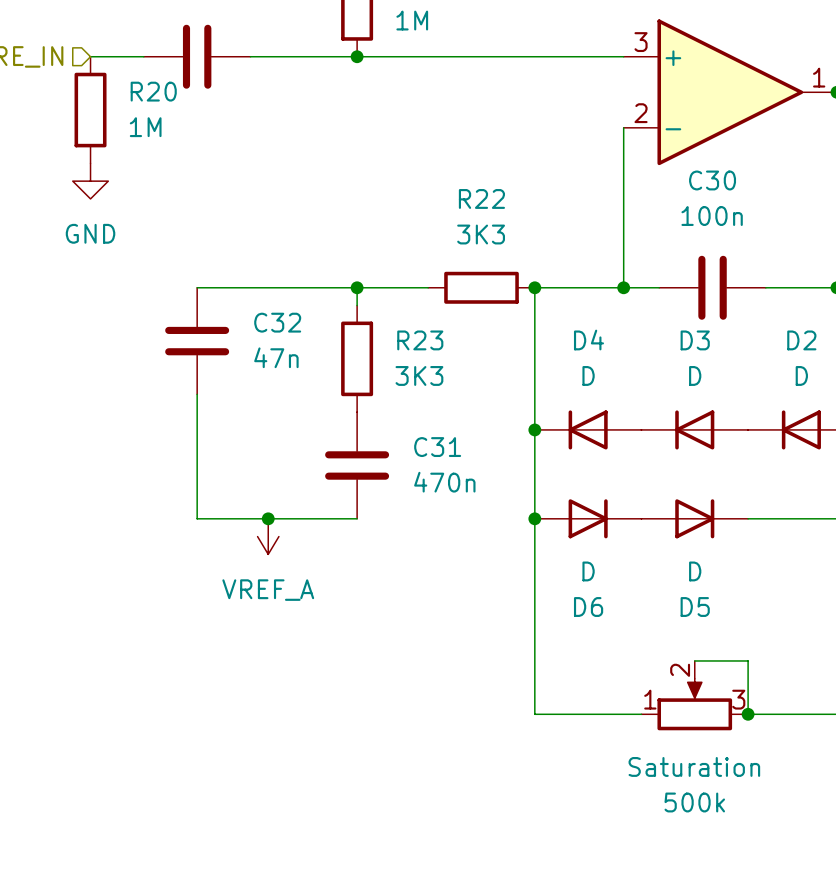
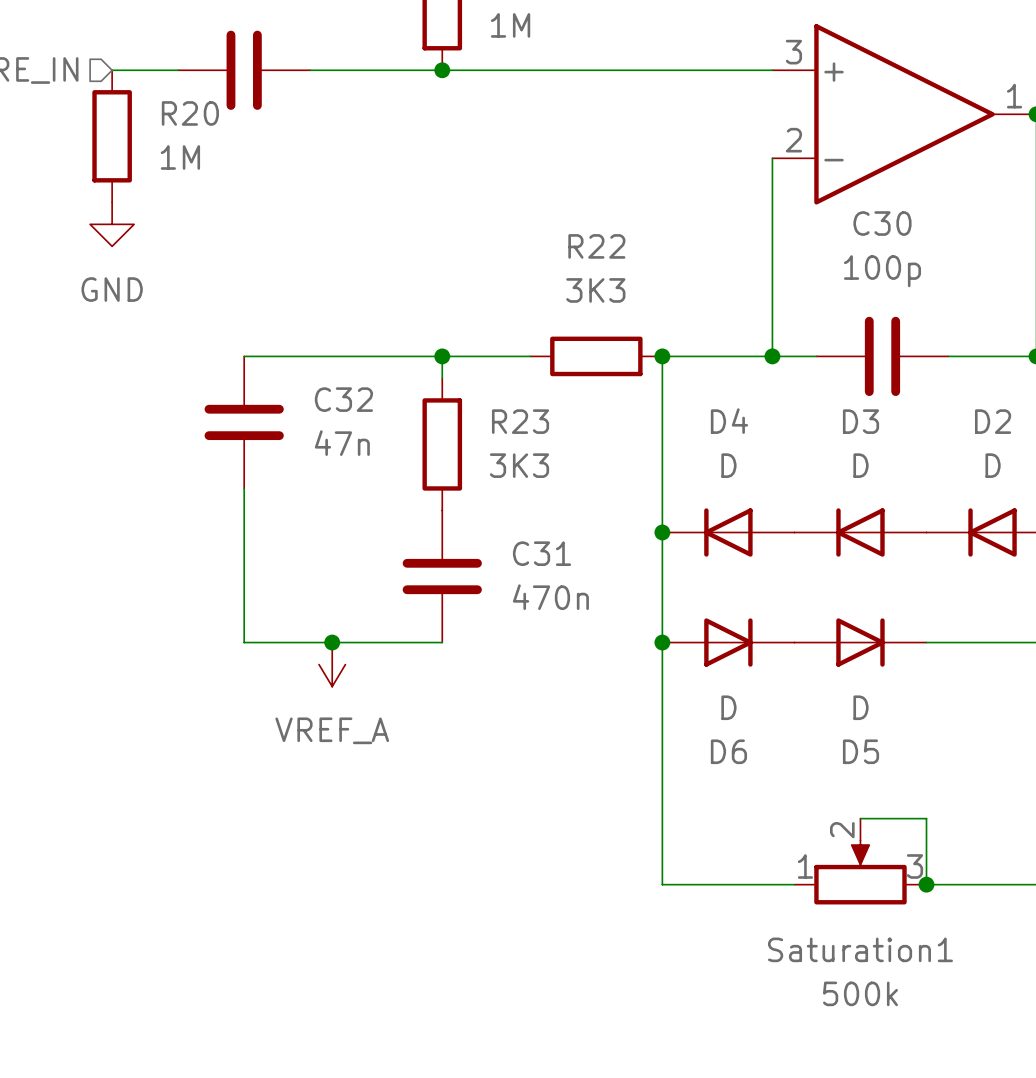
C30 value: 100n (712, 216) -> 100p (882, 271)
Saturation name: Saturation (694, 766) -> Saturation1 (860, 949)

